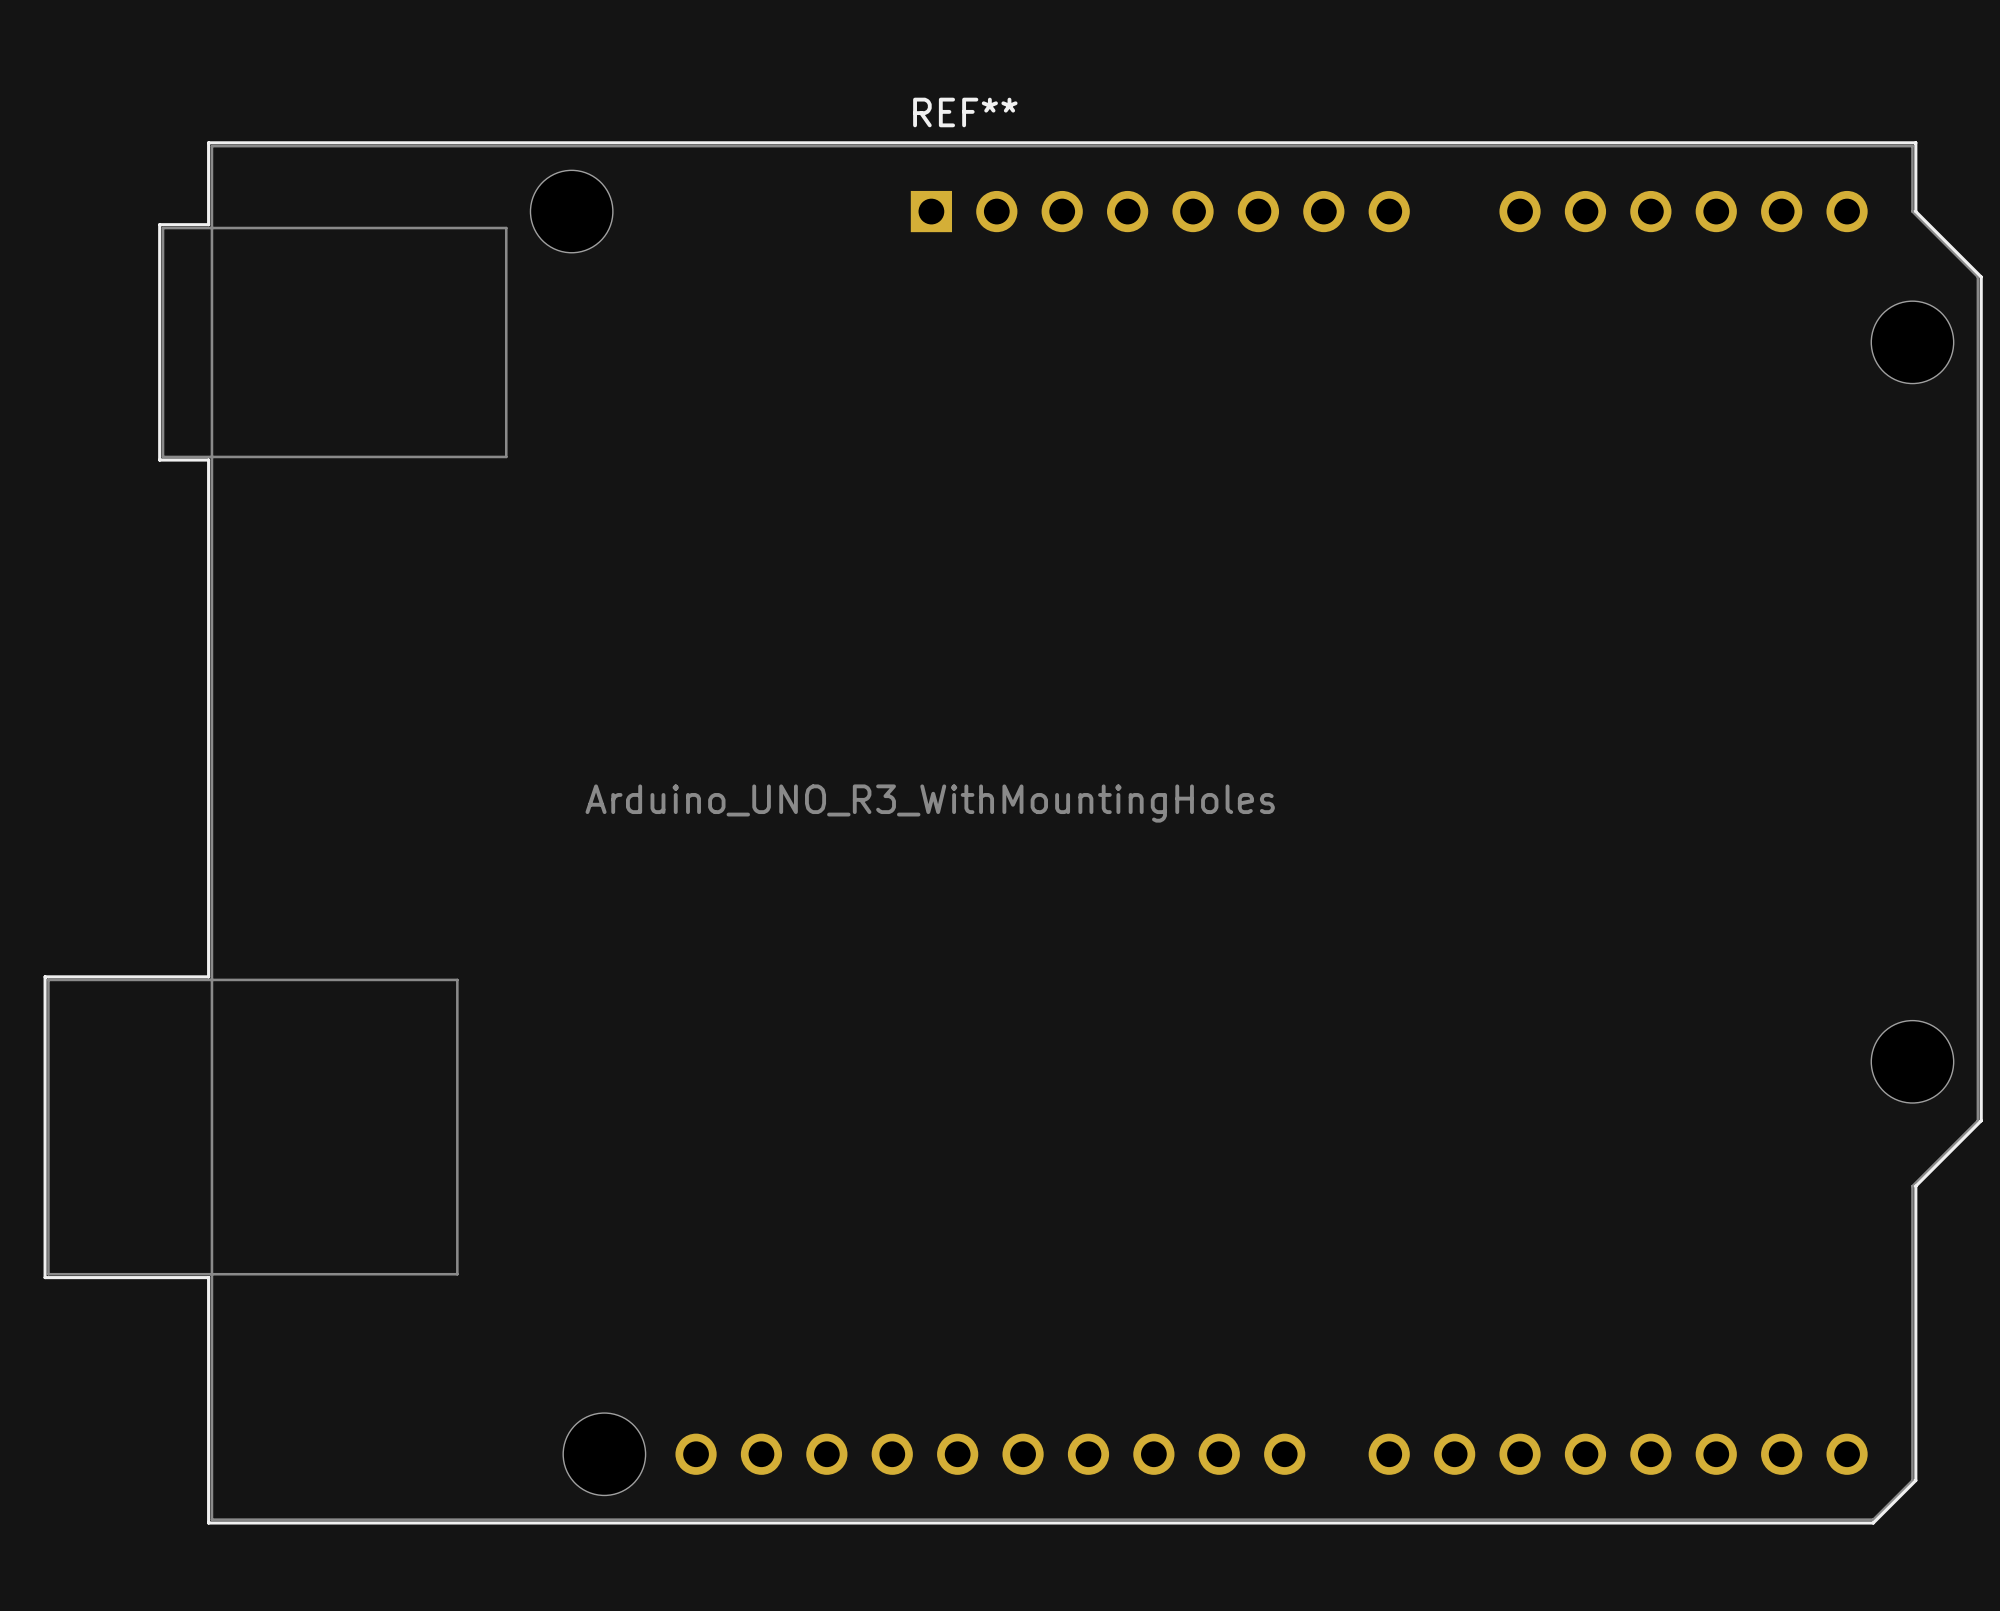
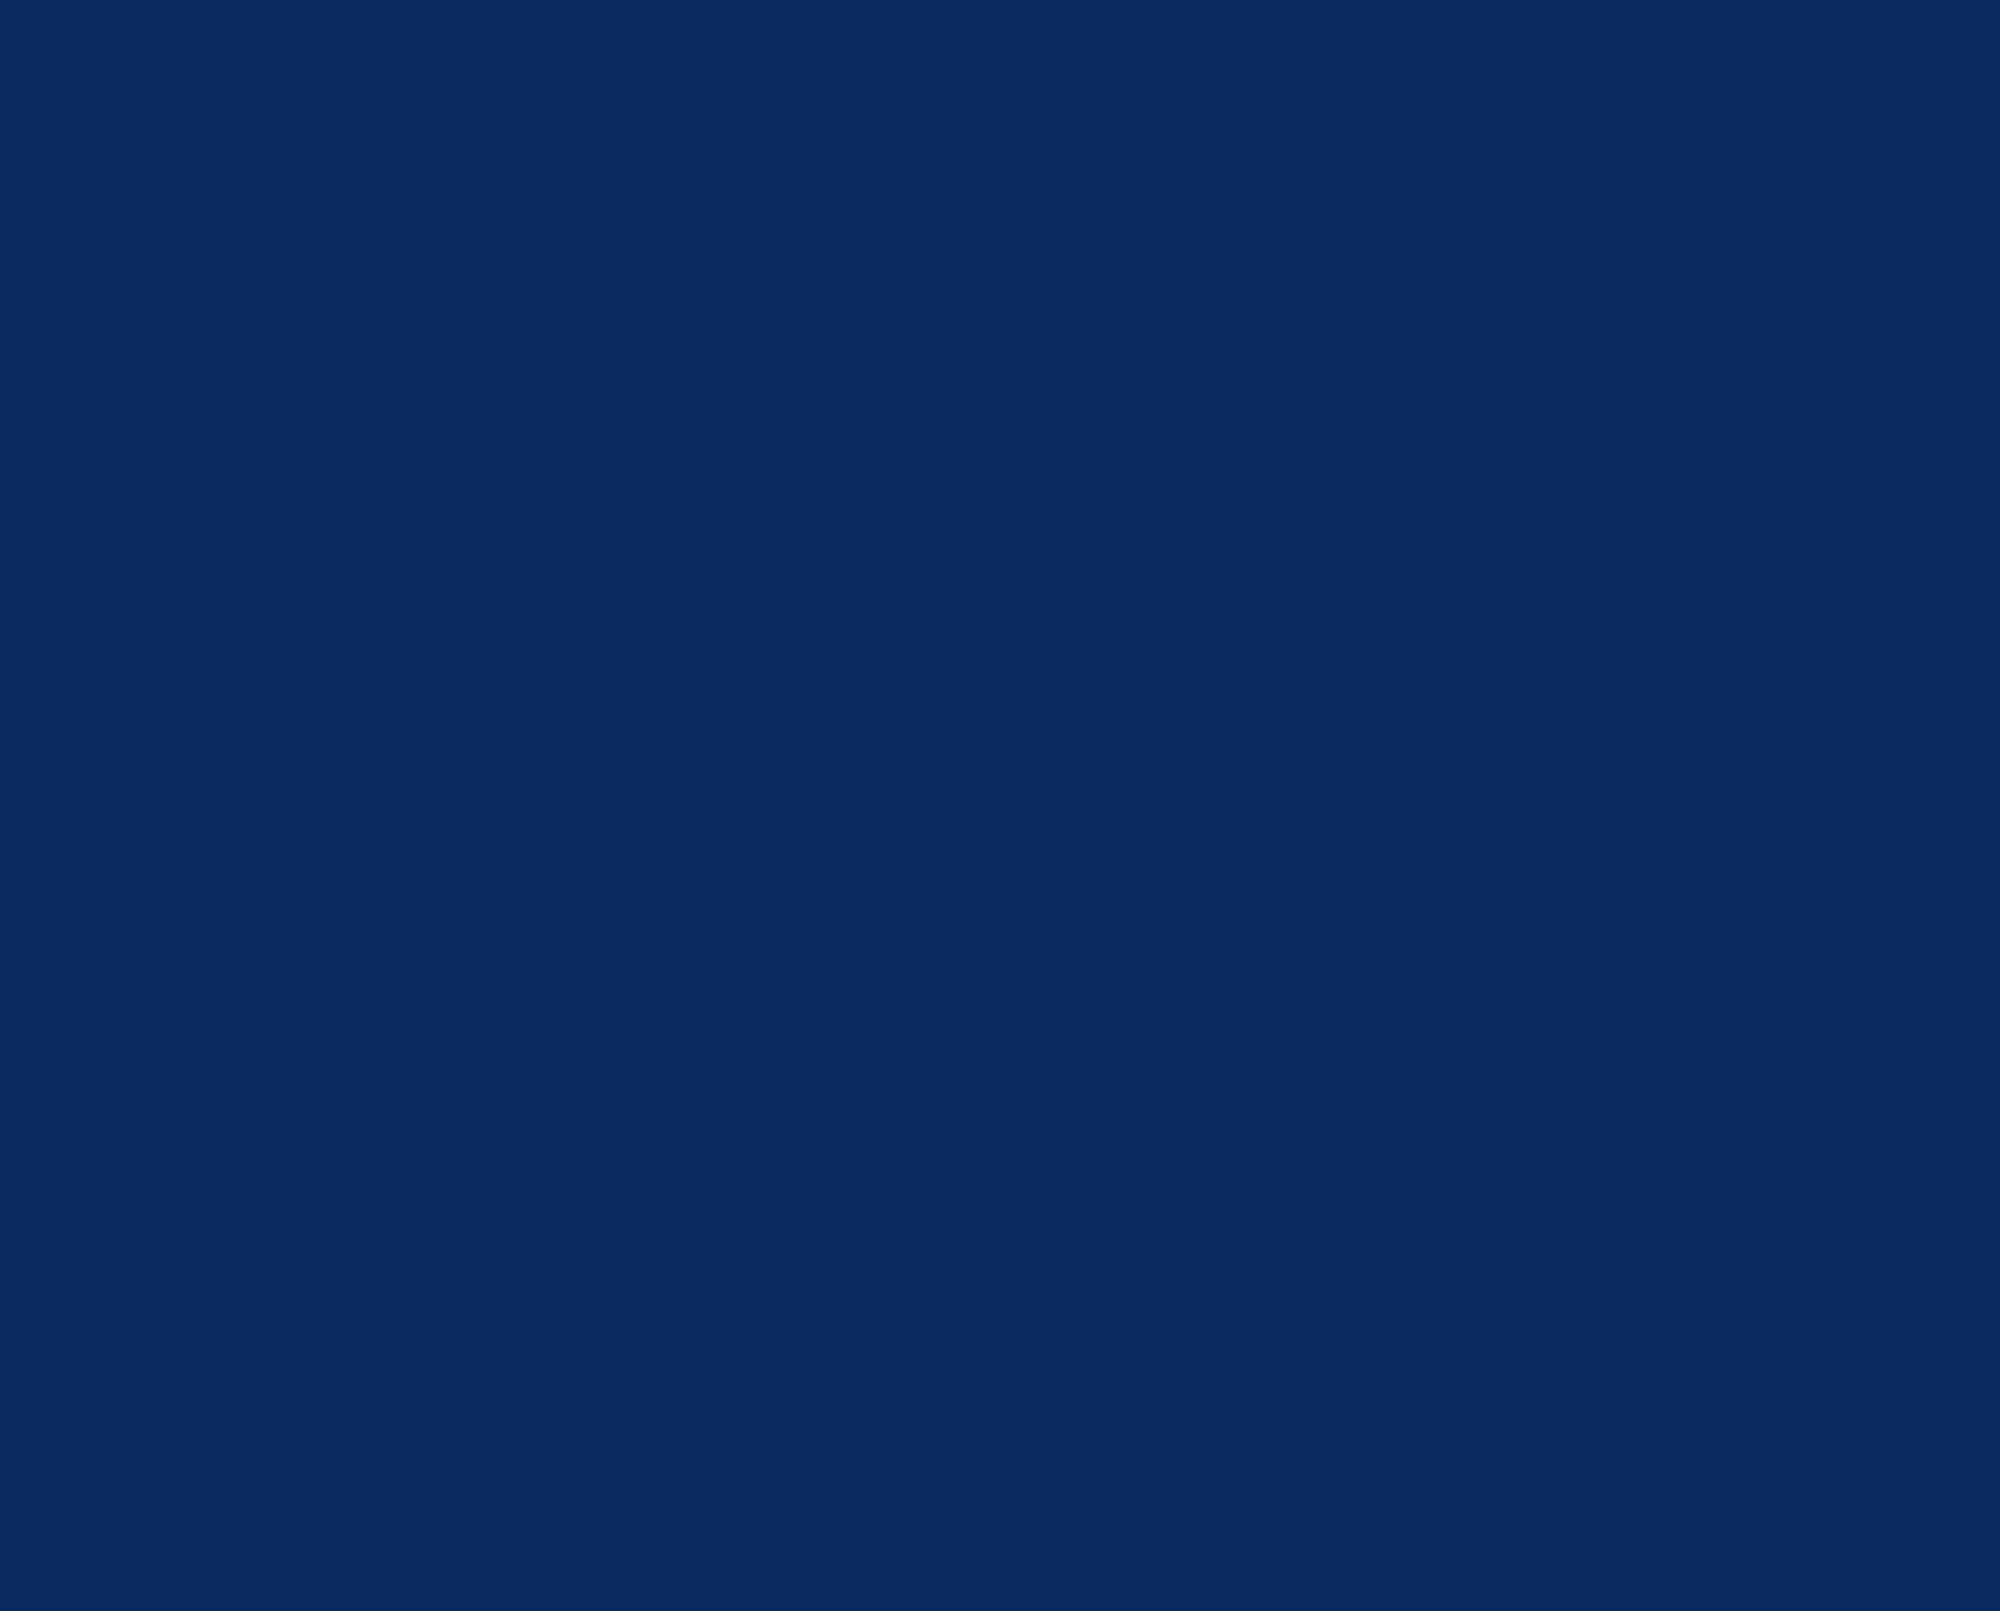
REF**: Arduino_UNO_R3_WithMountingHoles (1013, 832) -> none

